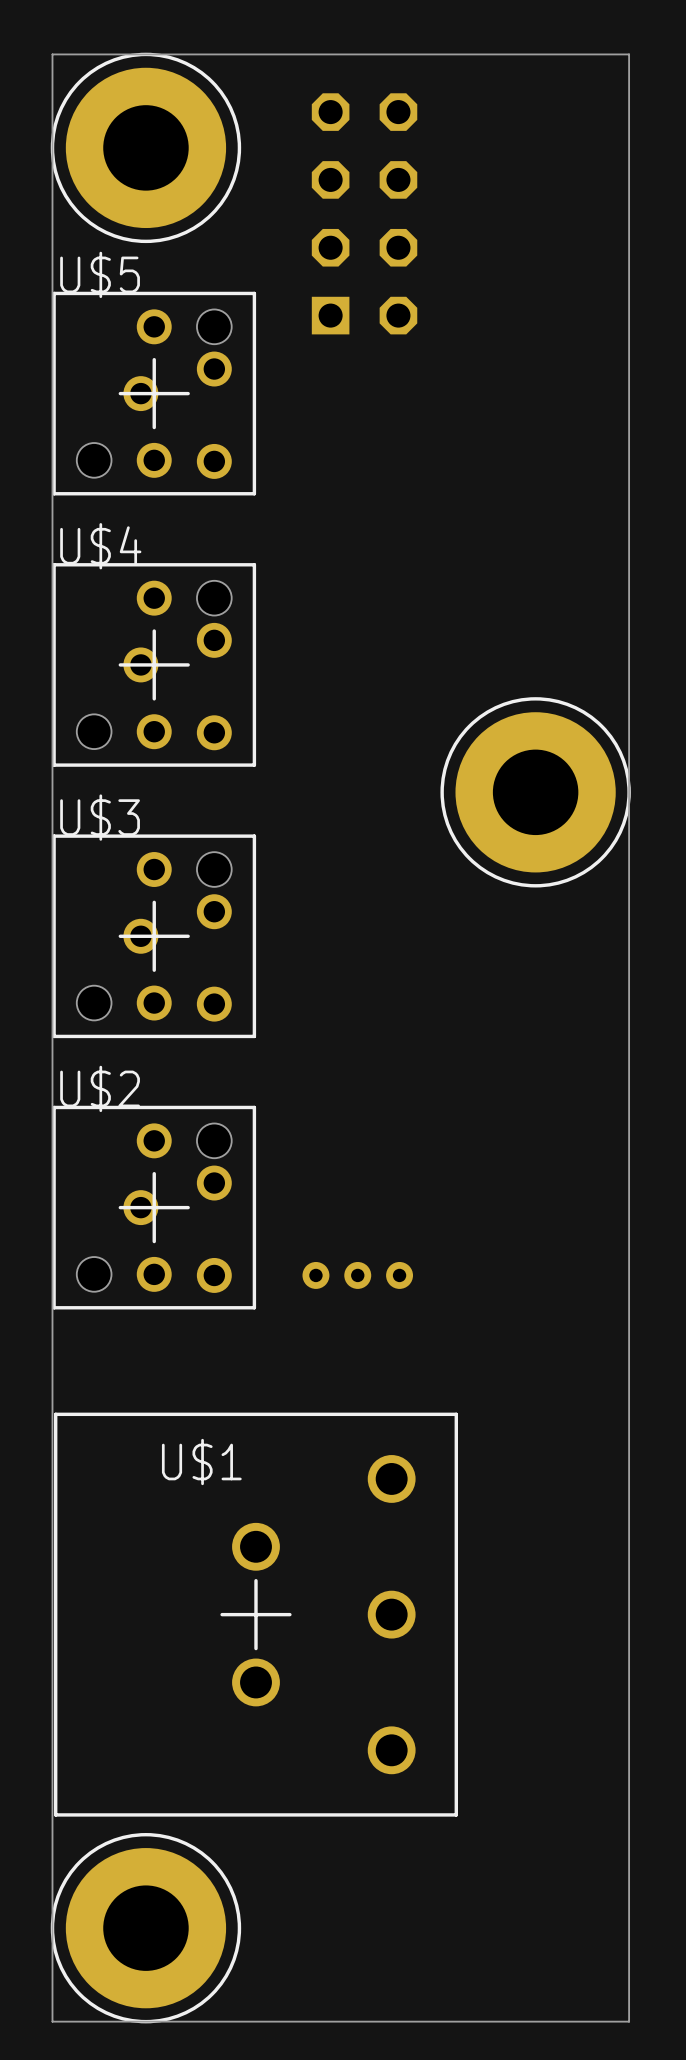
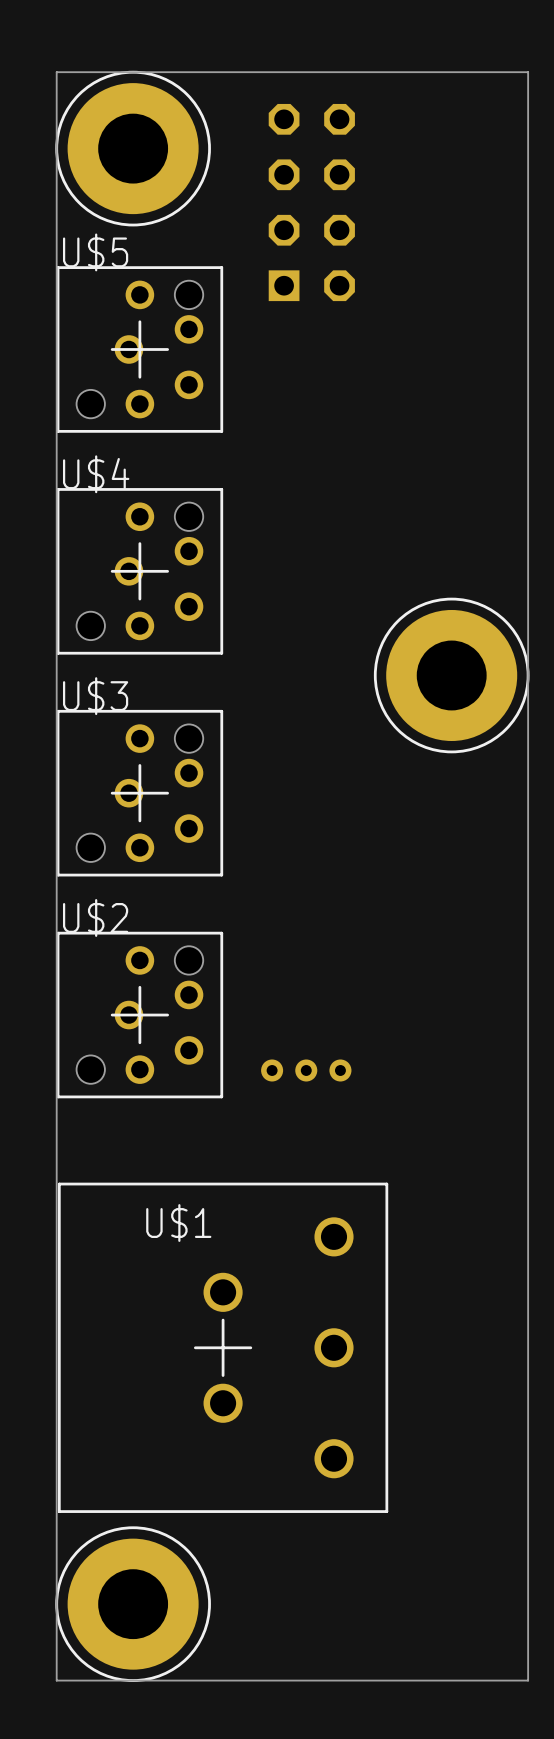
U$5 footprint: [52, 291, 257, 496] -> [56, 266, 224, 433]
U$4 footprint: [52, 563, 257, 767] -> [56, 488, 224, 655]
U$3 footprint: [52, 834, 257, 1039] -> [56, 709, 224, 877]
U$2 footprint: [52, 1105, 257, 1310] -> [56, 931, 224, 1099]

